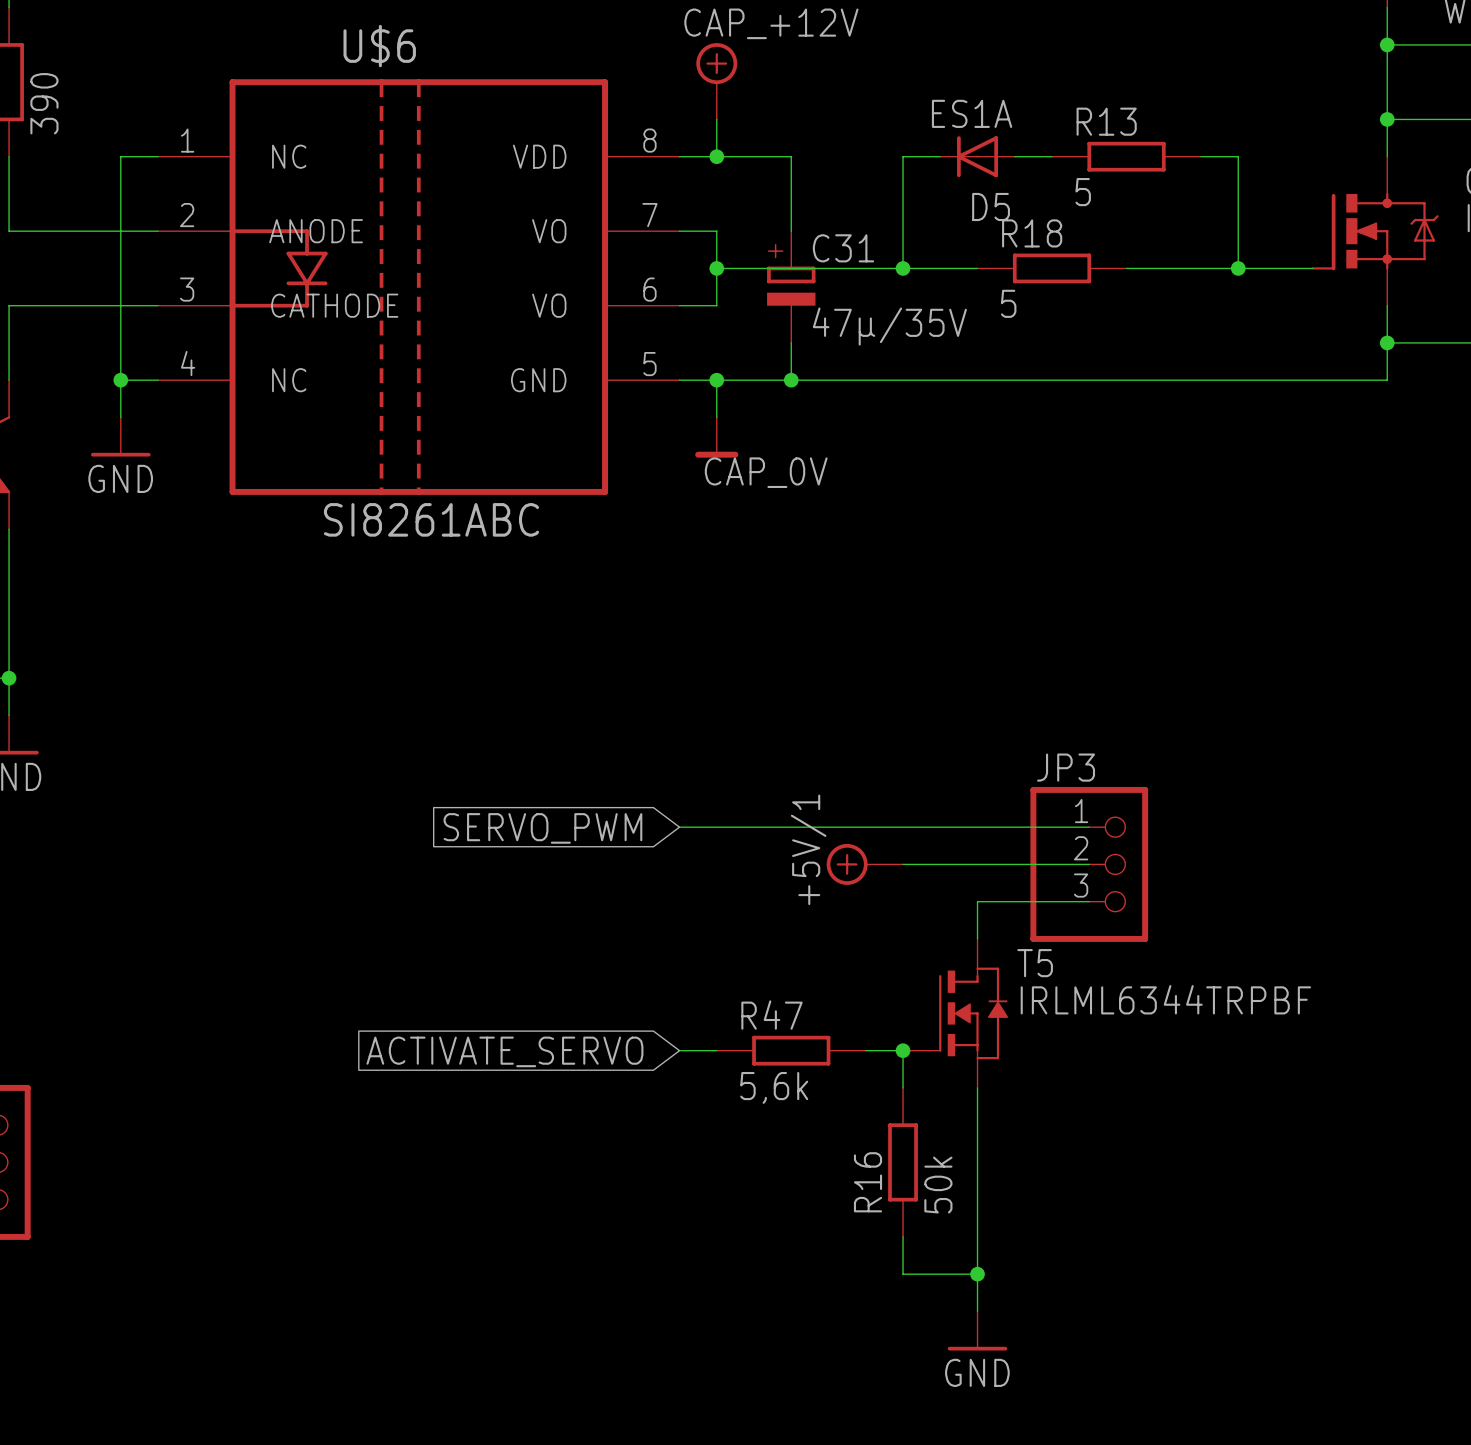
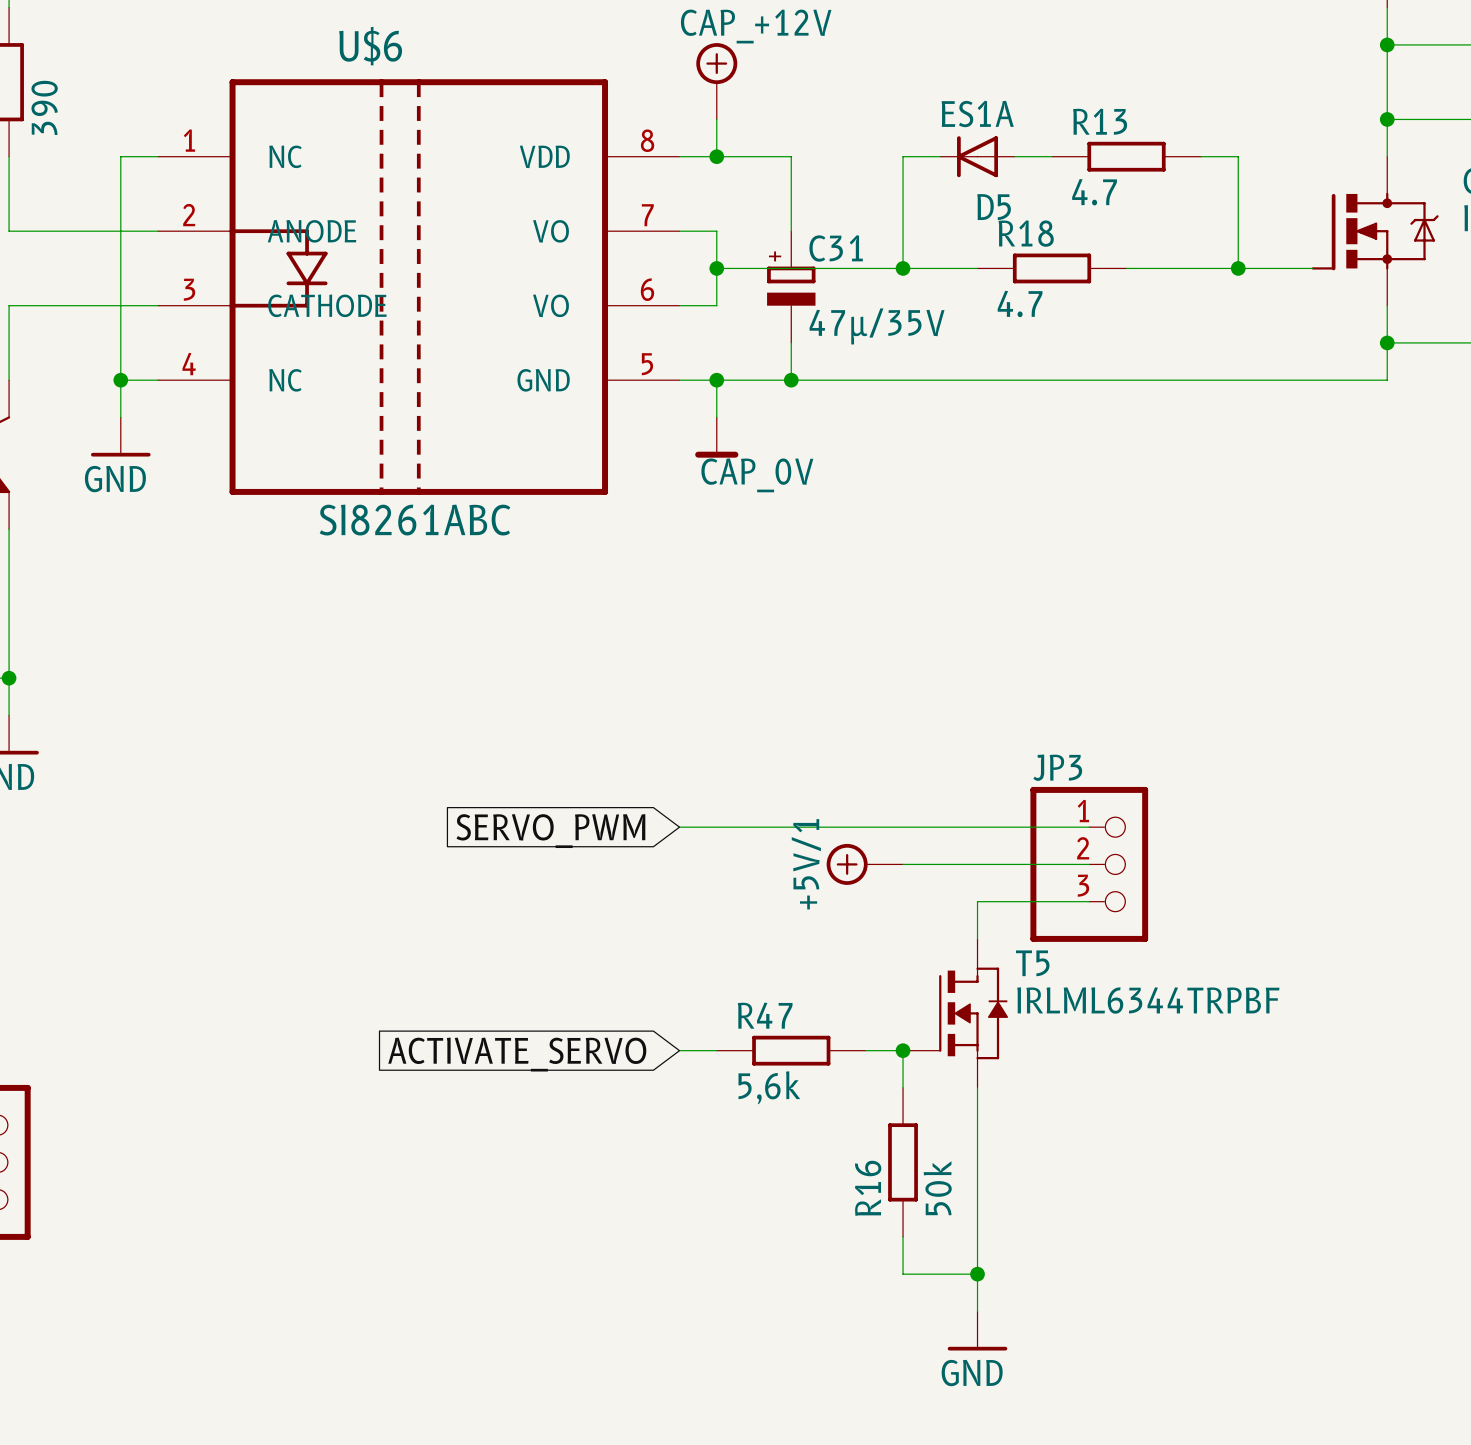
R13 value: 5 (1083, 192) -> 4.7 (1094, 192)
R18 value: 5 (1008, 303) -> 4.7 (1020, 303)

